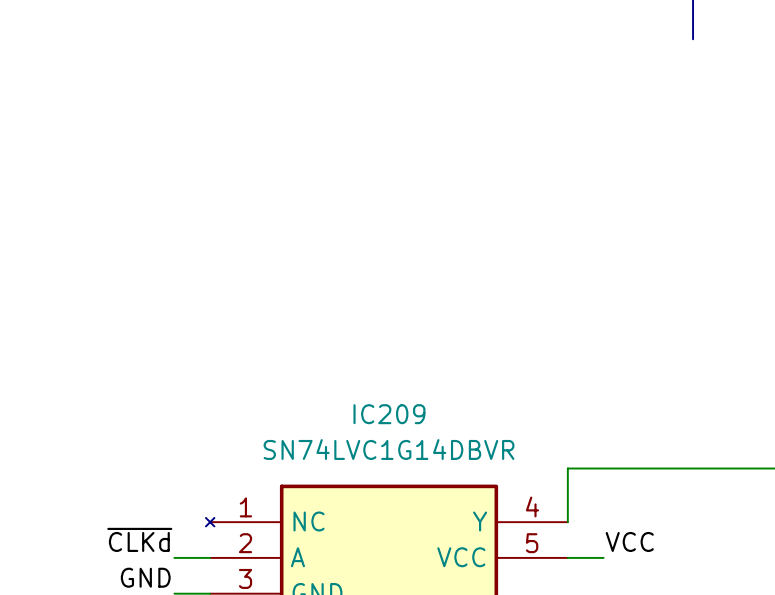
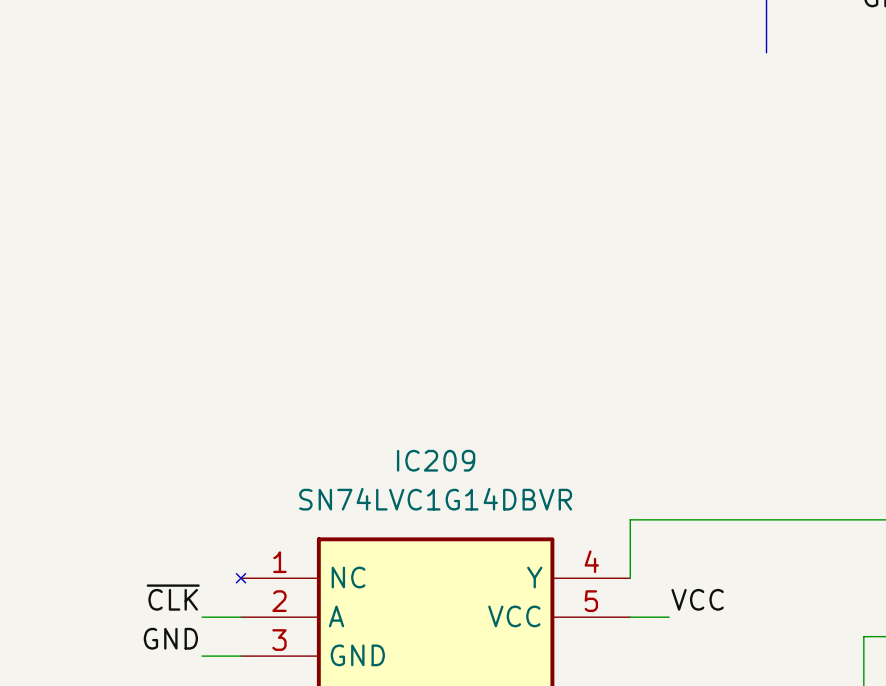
label: ~{CLKd} (139, 539) -> ~{CLK} (173, 597)

